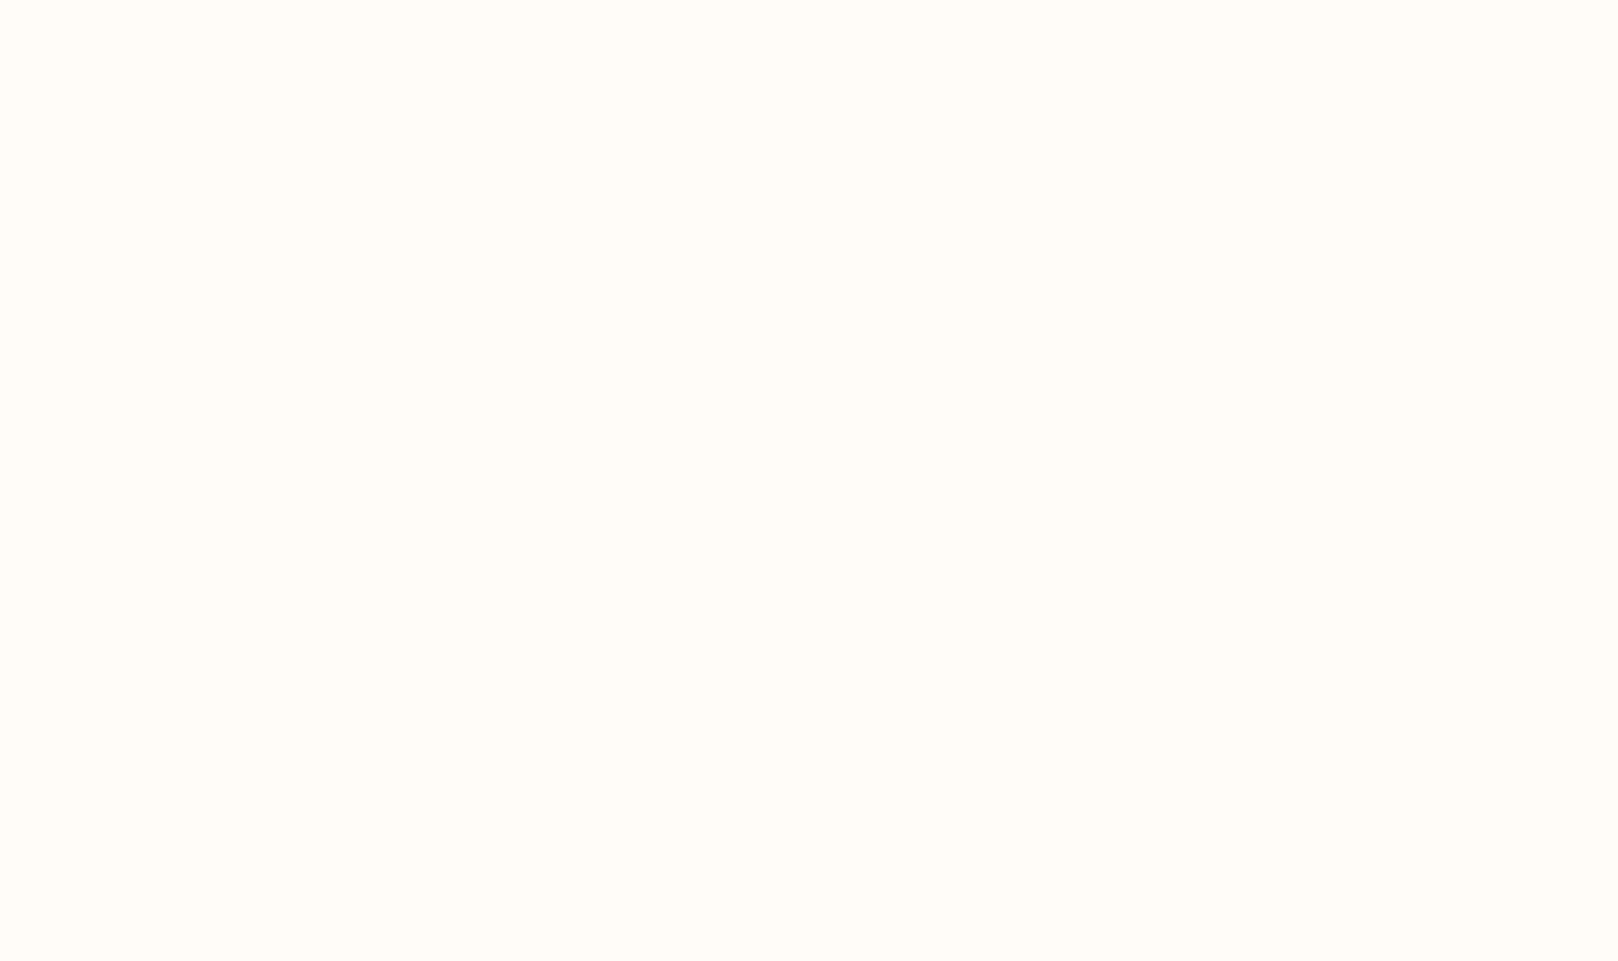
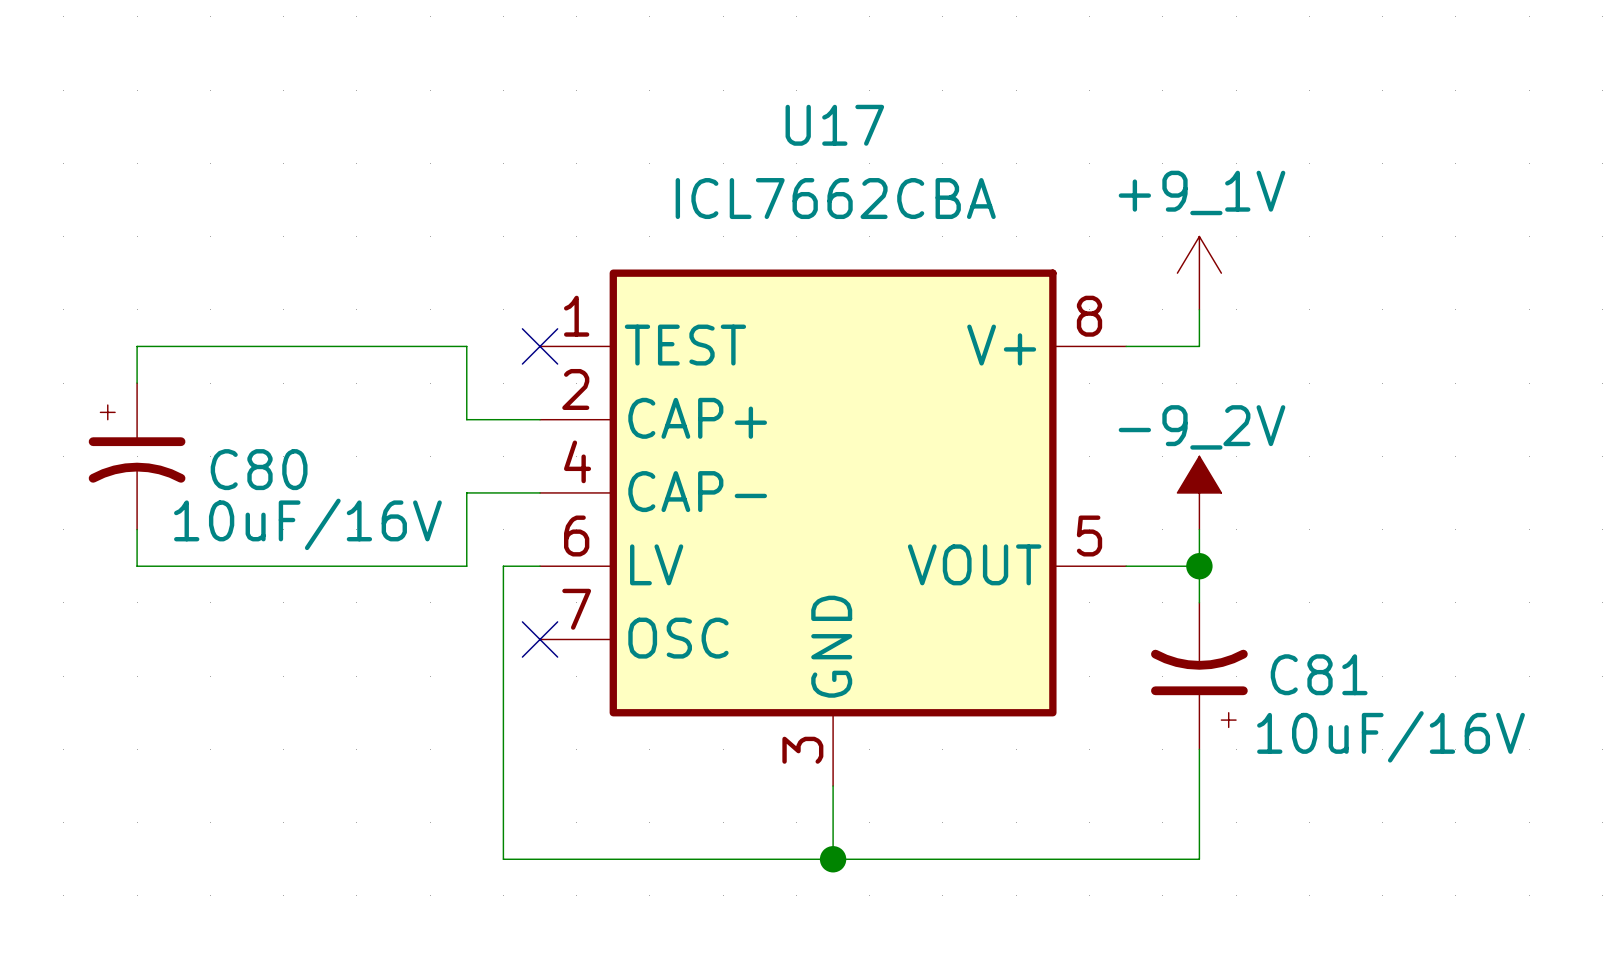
power symbol: none -> +9_1V (1199, 273)
wire: none -> (1199, 309) (1199, 346) (1126, 346)
no-connect mark: none -> (540, 346)
wire: none -> (137, 383) (137, 346) (466, 346) (466, 419) (540, 419)
C80: none -> 10uF/16V (137, 456)
wire: none -> (540, 492) (466, 492) (466, 566) (137, 566) (137, 529)
power symbol: none -> -9_2V (1199, 492)
U17: none -> ICL7662CBA (833, 527)
wire: none -> (1199, 529) (1199, 602)
wire: none -> (540, 566) (503, 566) (503, 859) (1199, 859) (1199, 749)
wire: none -> (1126, 566) (1199, 566)
junction: none -> (1199, 566)
no-connect mark: none -> (540, 639)
C81: none -> 10uF/16V (1199, 676)
wire: none -> (833, 786) (833, 859)
junction: none -> (833, 859)

